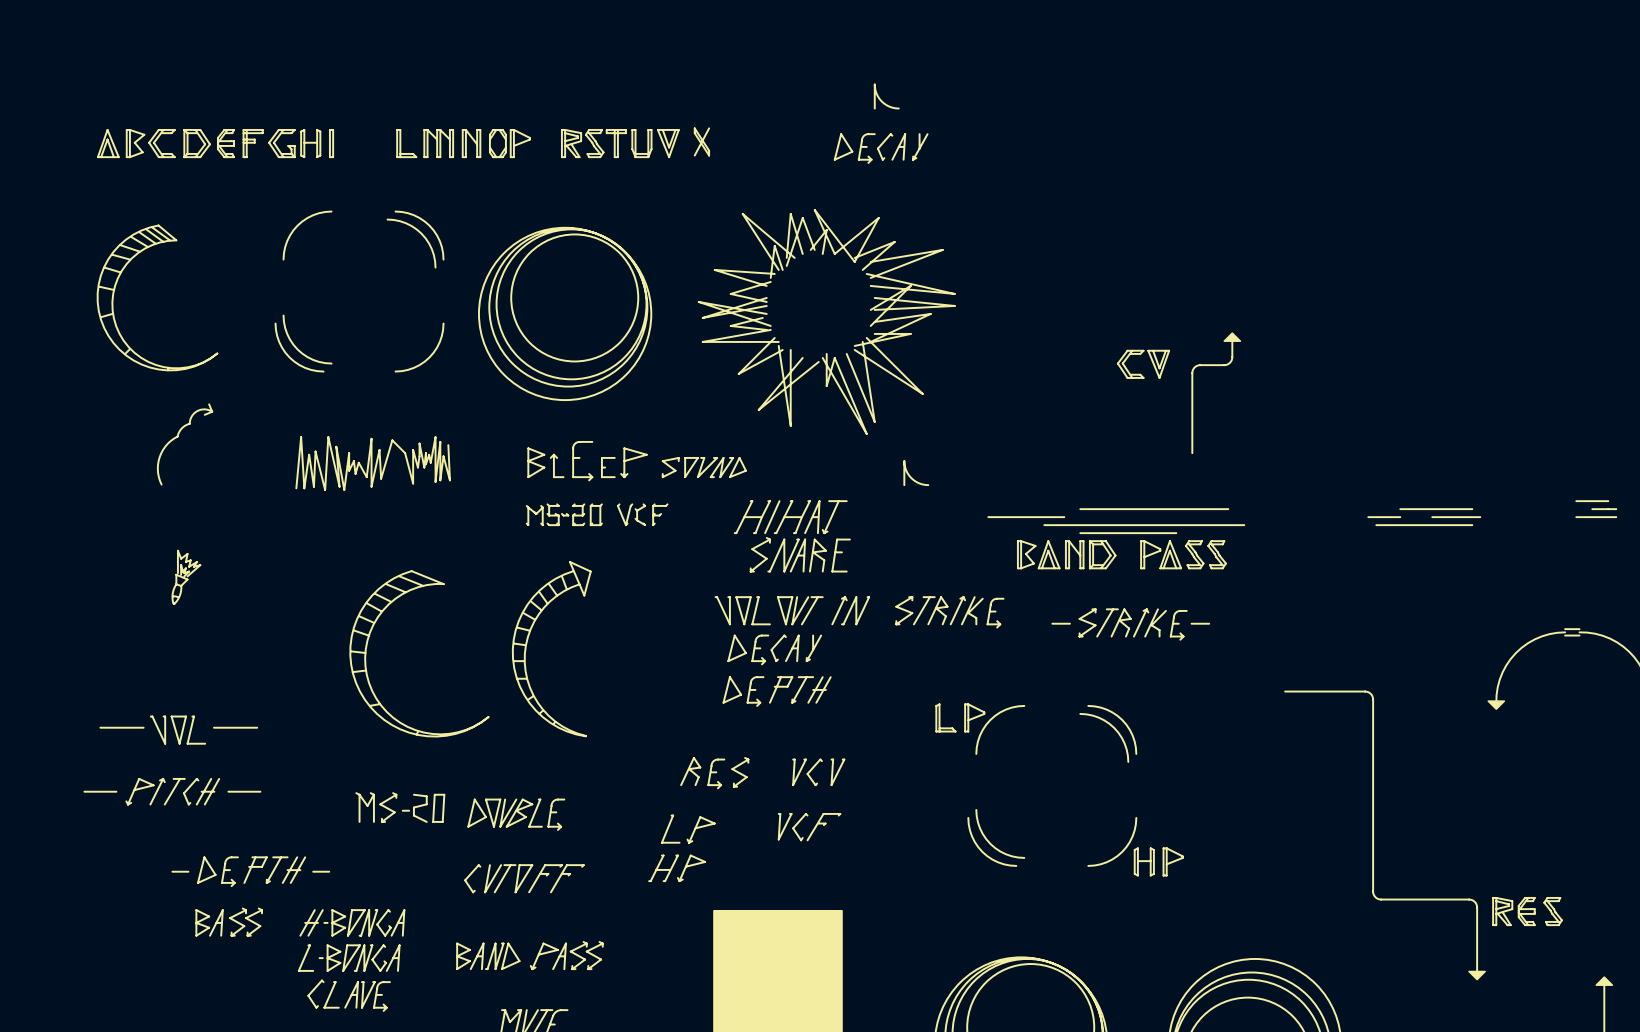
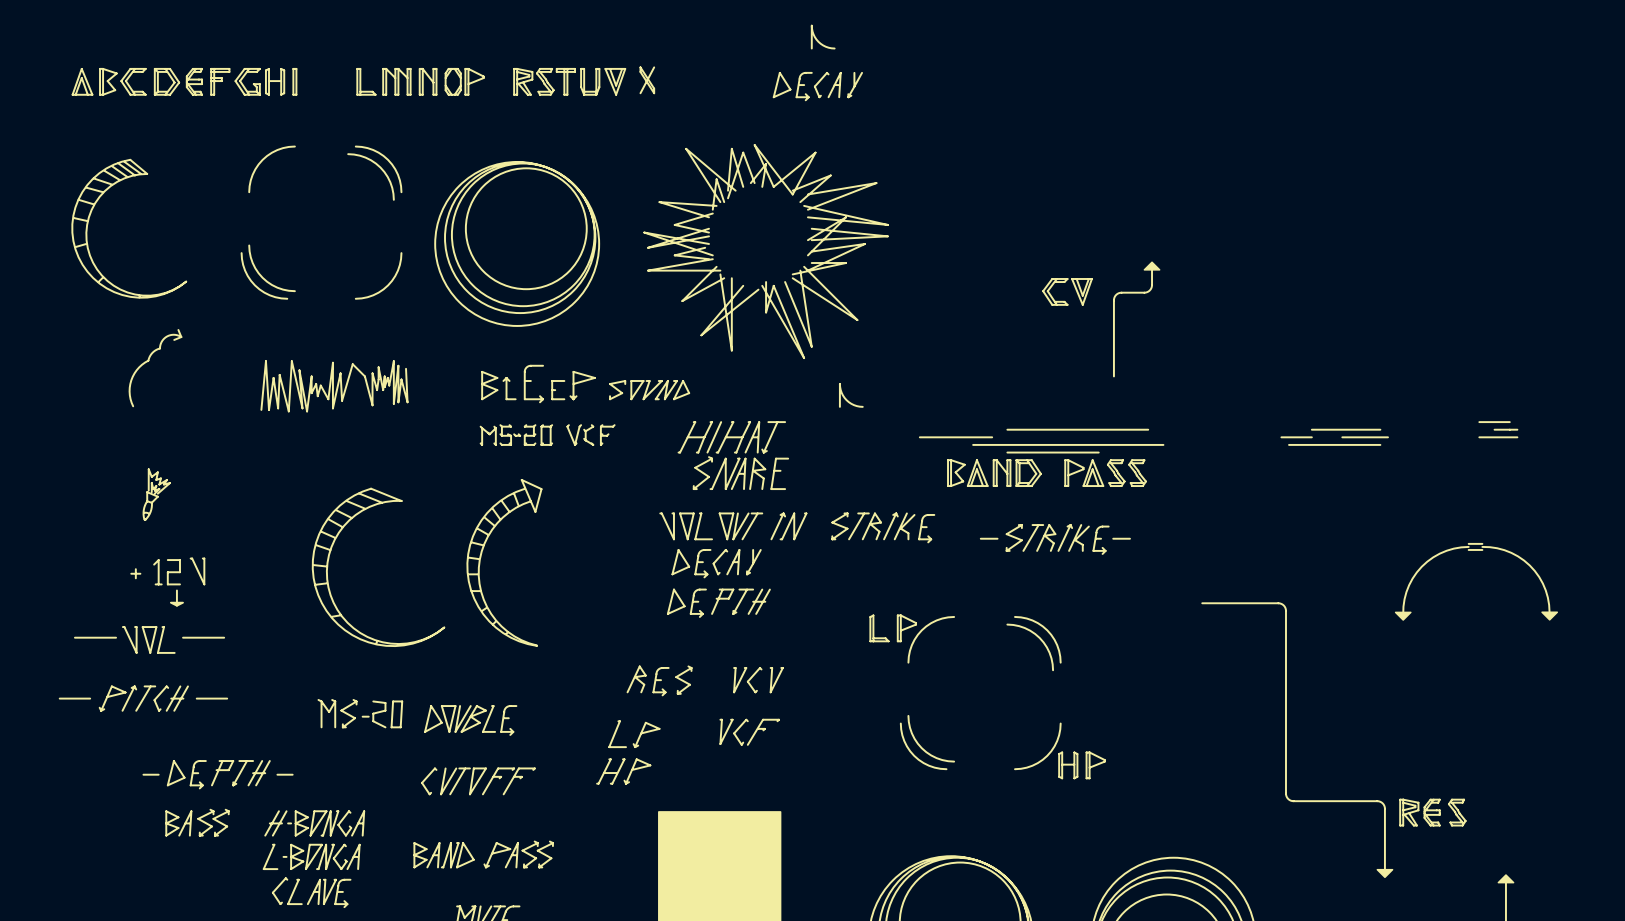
line: none -> (190, 558) (204, 584) (204, 558) (202, 558)
line: none -> (167, 560) (179, 560) (179, 572) (167, 572) (167, 584) (179, 584)
line: none -> (154, 564) (158, 560) (158, 584)
line: none -> (135, 569) (135, 578)
line: none -> (131, 573) (140, 573)
line: none -> (155, 584) (161, 584)
line: none -> (176, 590) (176, 605)
drawing: none -> [169, 601, 184, 607]

